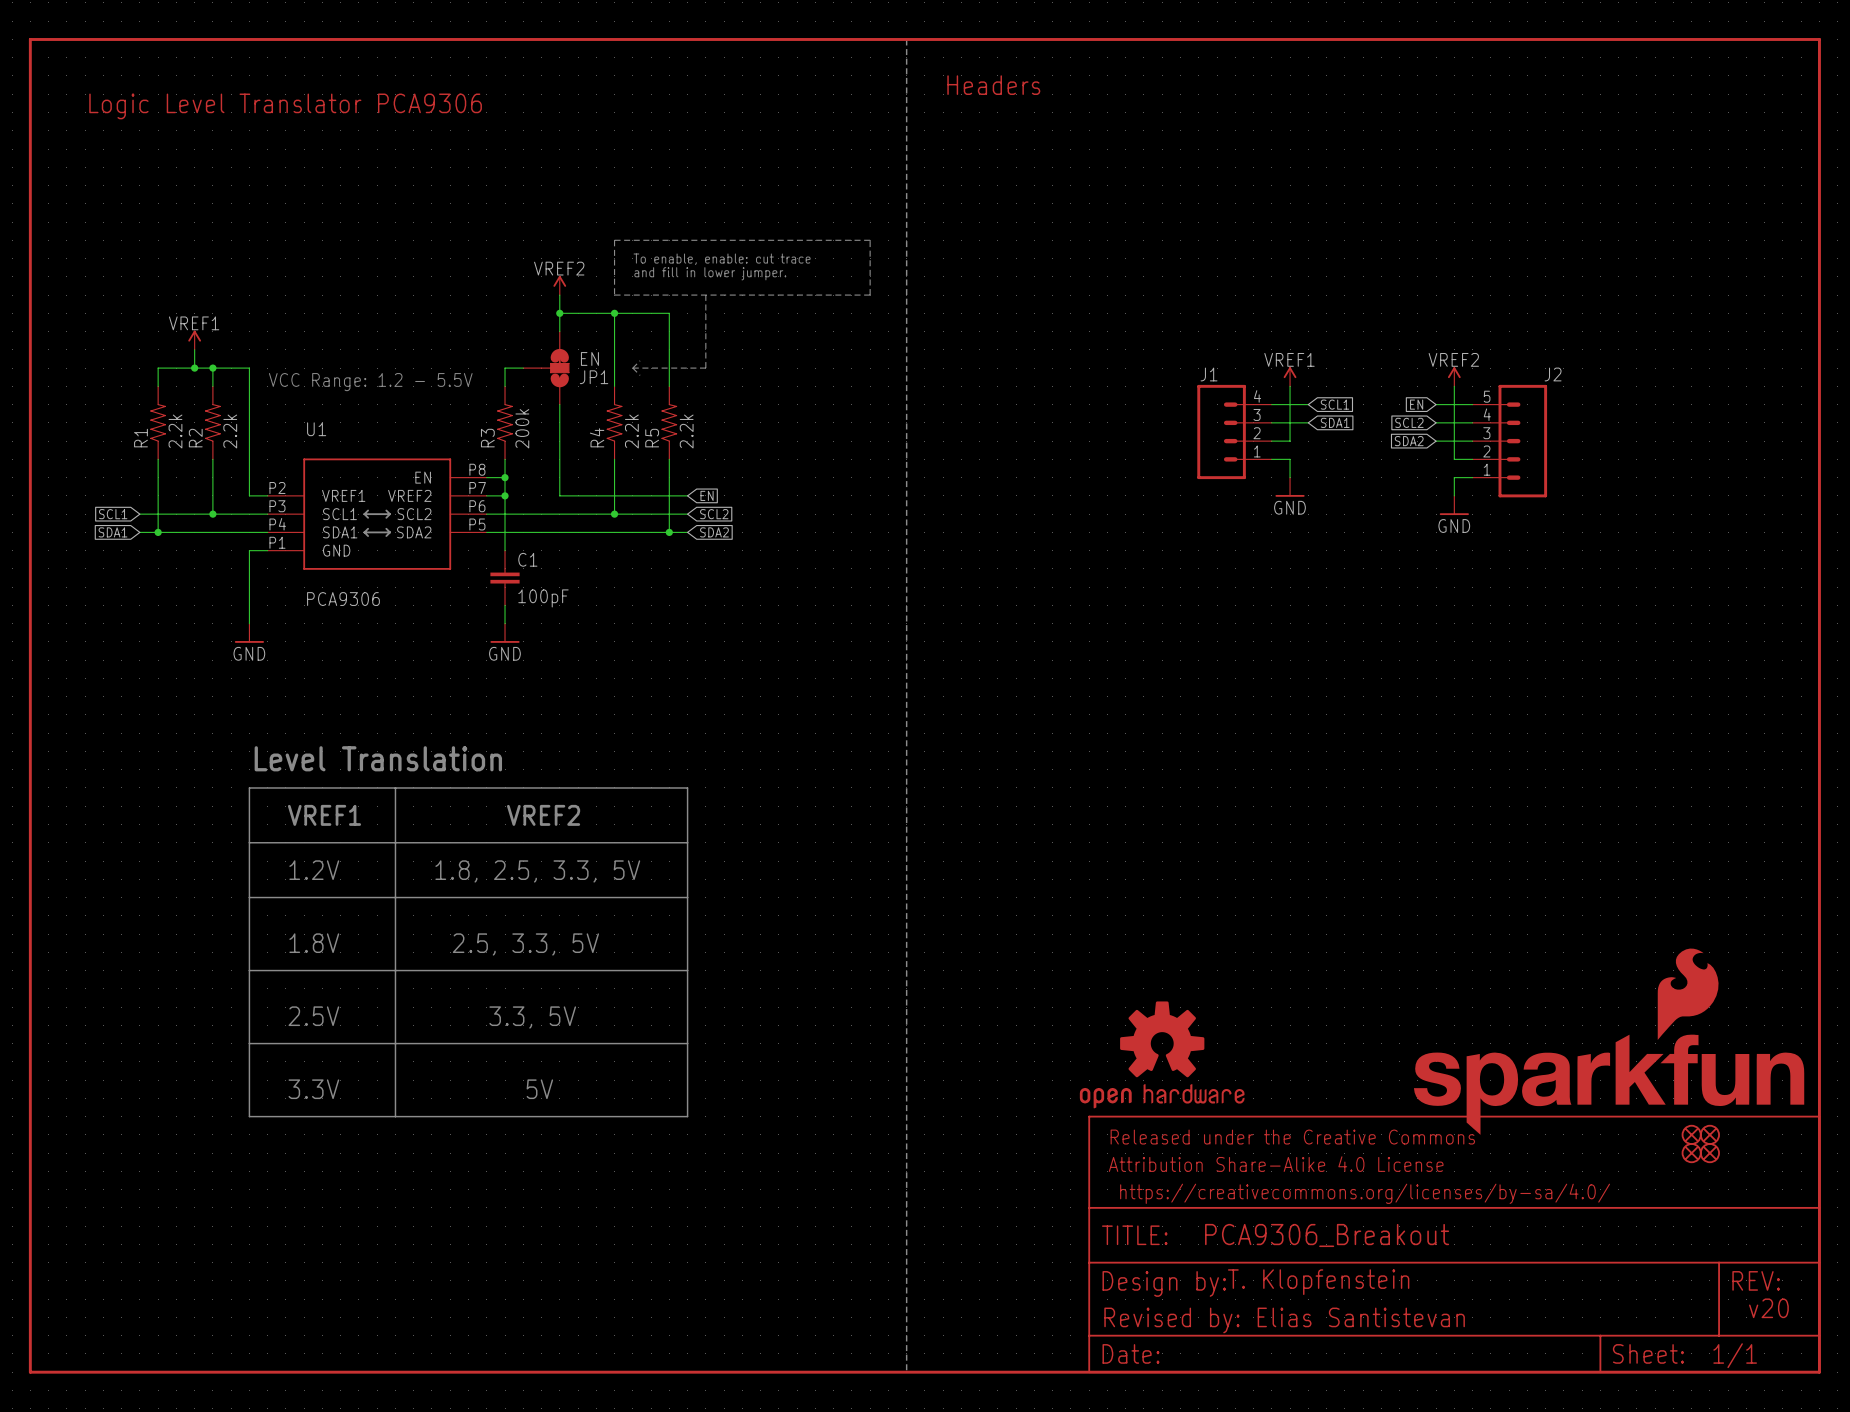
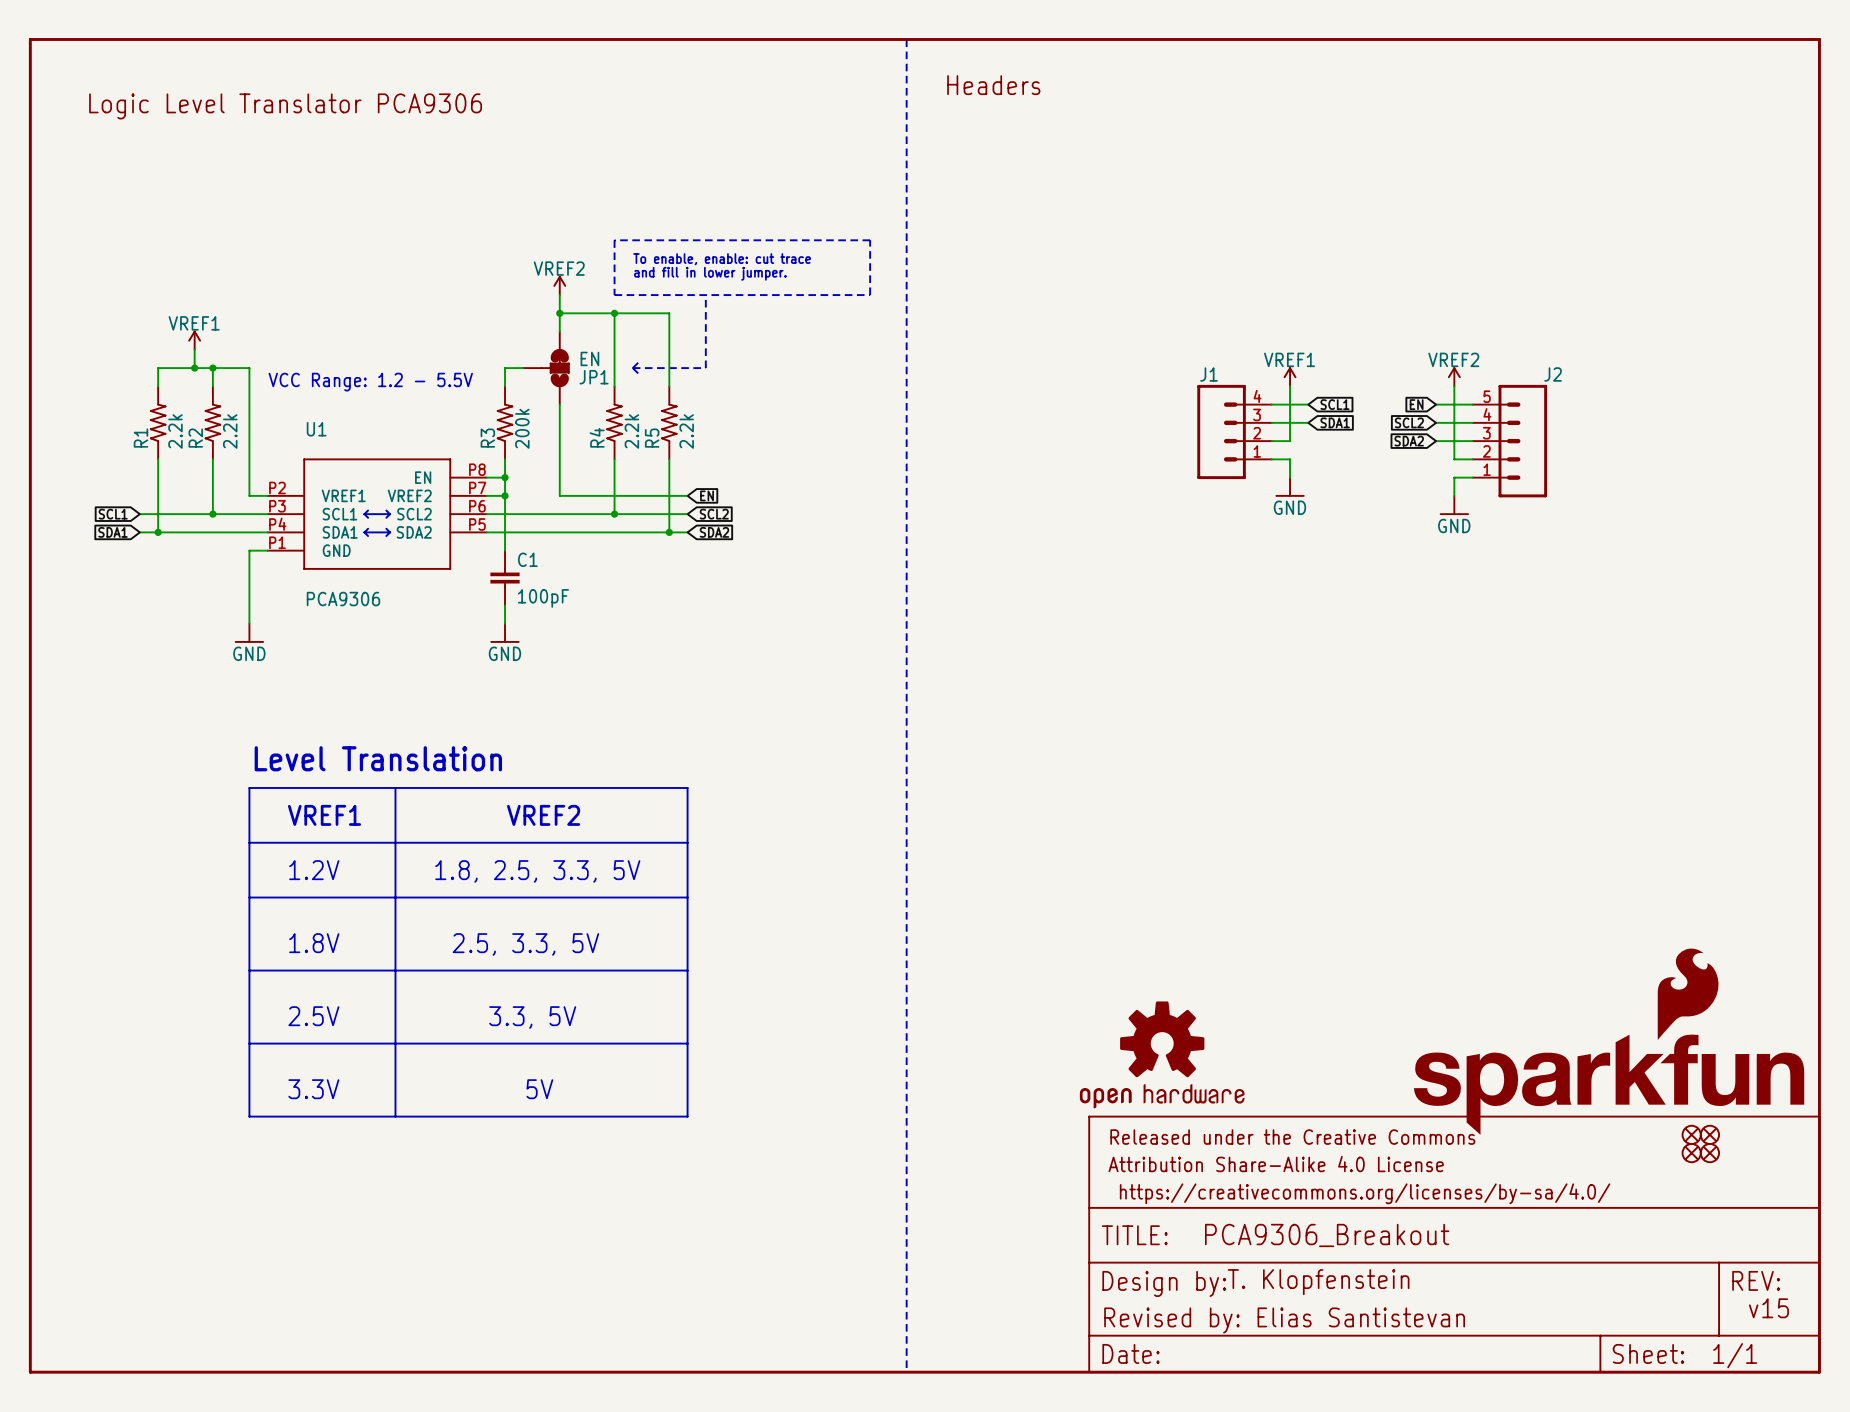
text: v20 (1768, 1308) -> v15 (1768, 1308)

